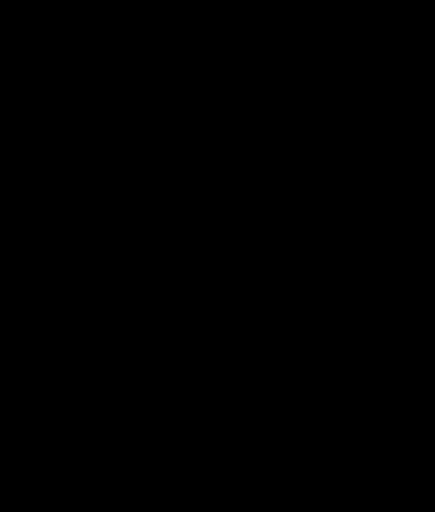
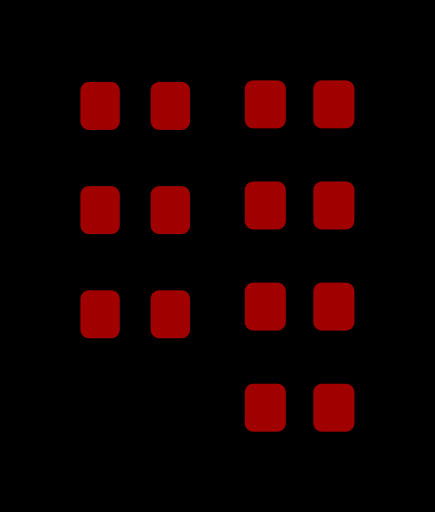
part: none -> (299, 104)
part: none -> (135, 105)
part: none -> (299, 205)
part: none -> (135, 210)
part: none -> (299, 306)
part: none -> (135, 314)
part: none -> (299, 407)

